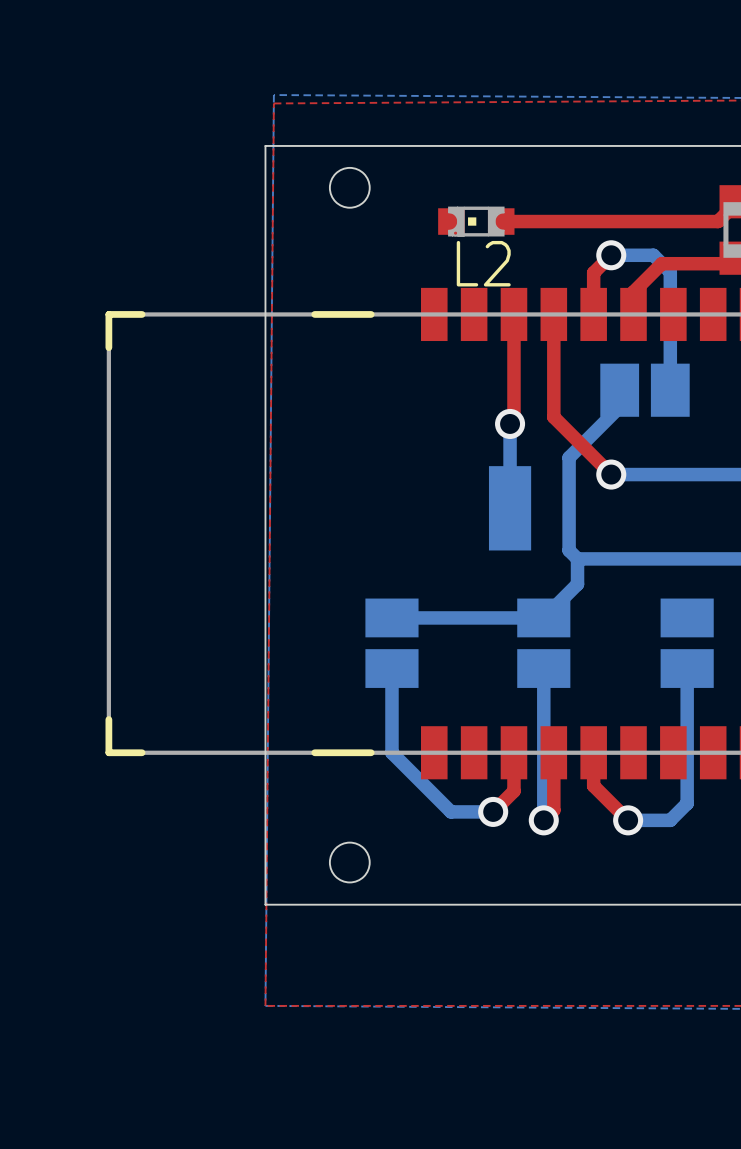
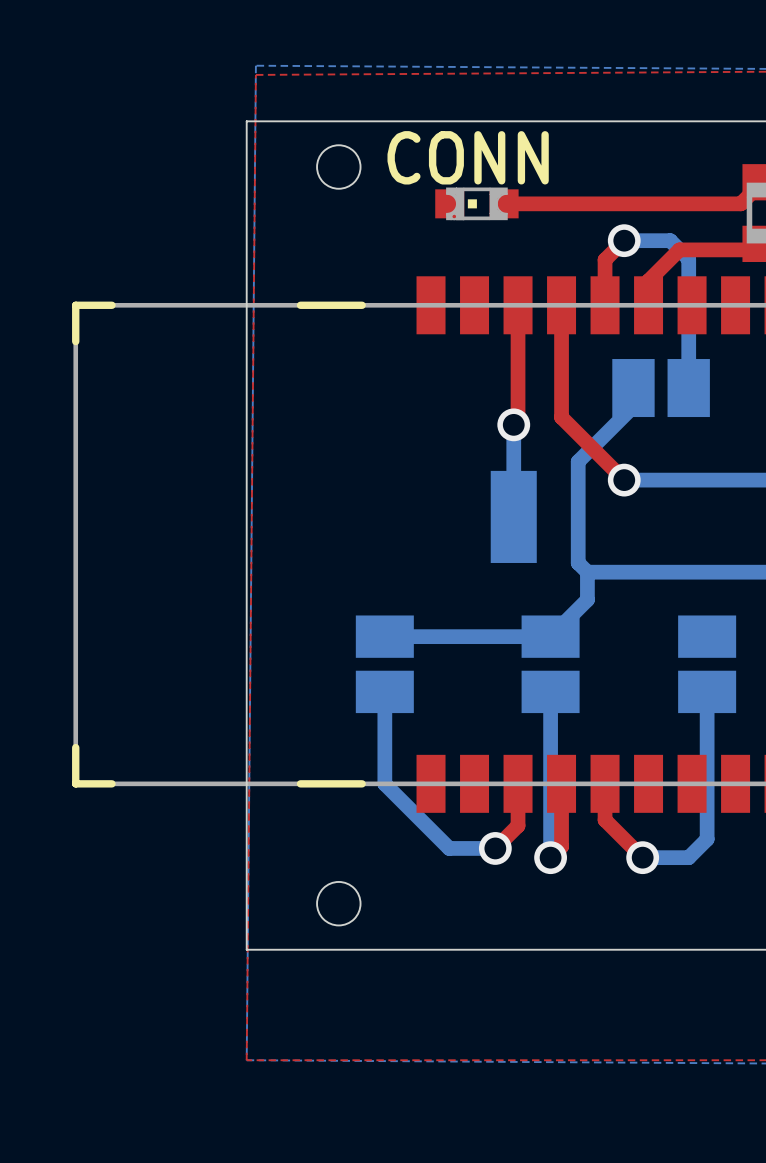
L2 name: L2 (483, 263) -> CONN (468, 157)

